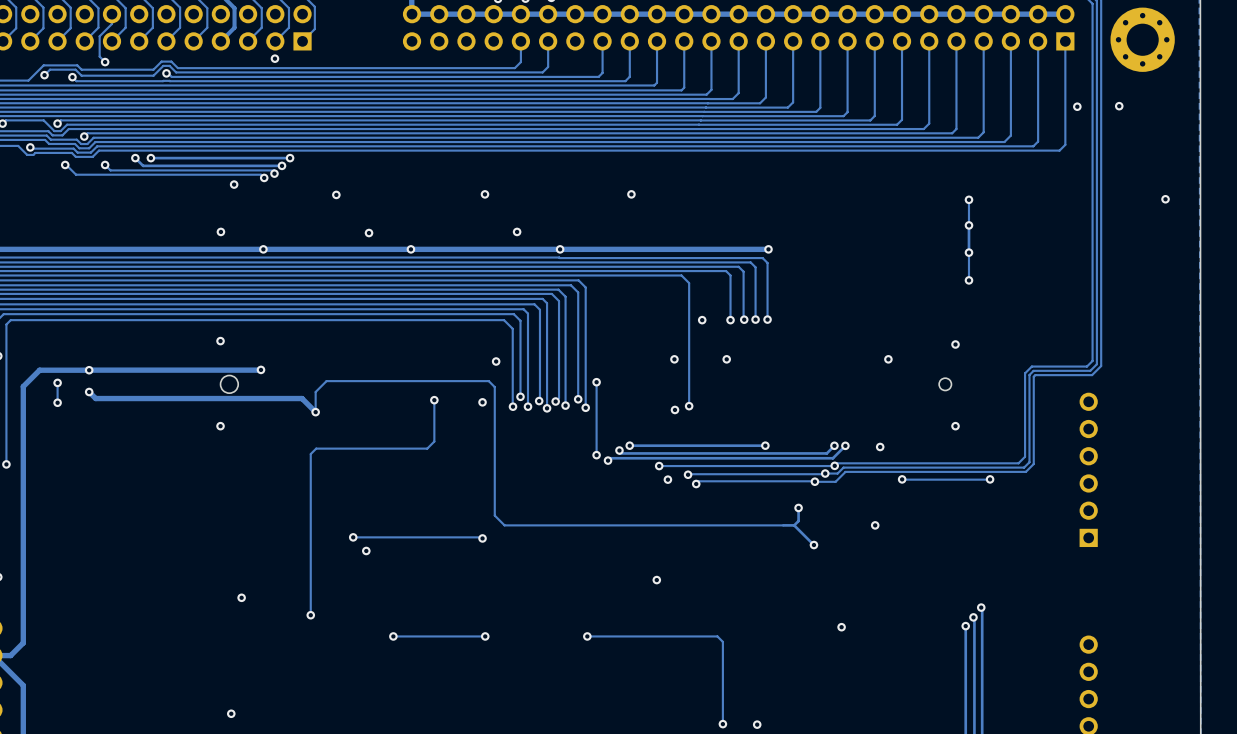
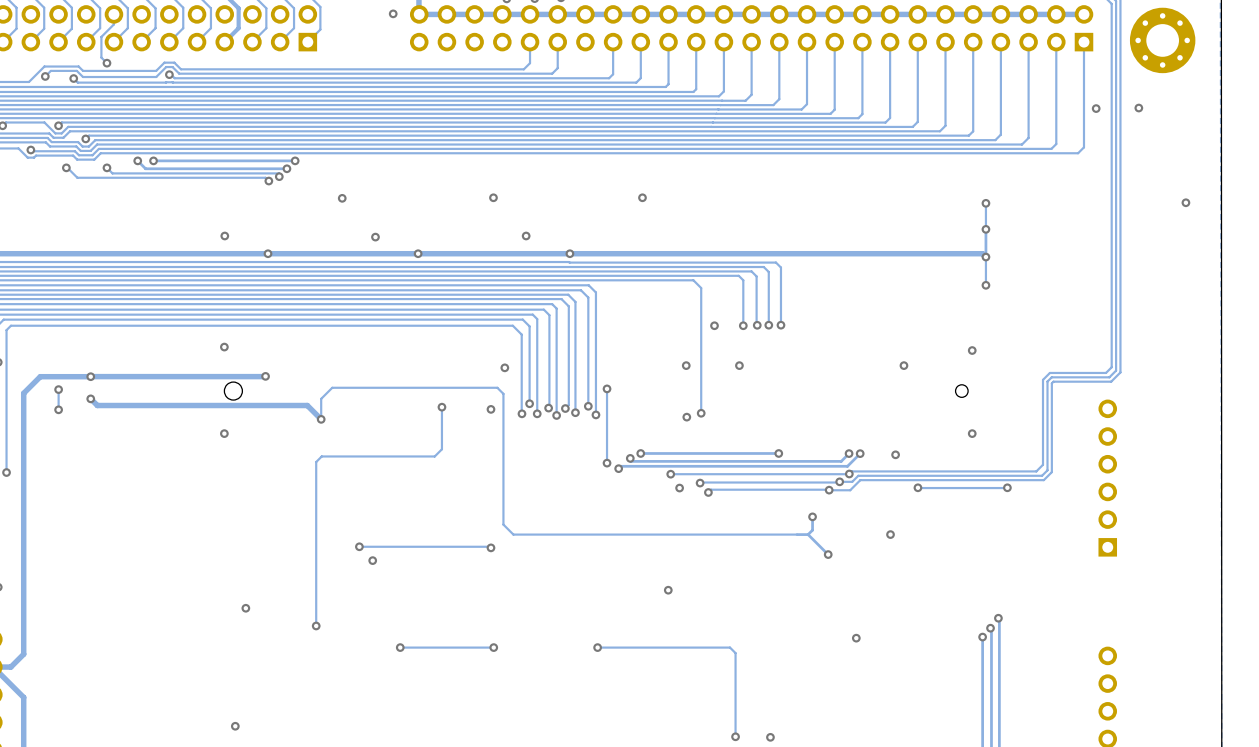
via: none -> (393, 13)
via: (274, 58) -> none
via: (234, 184) -> none
track: none -> (781, 253) (982, 253) (985, 257)
via: (768, 249) -> none

